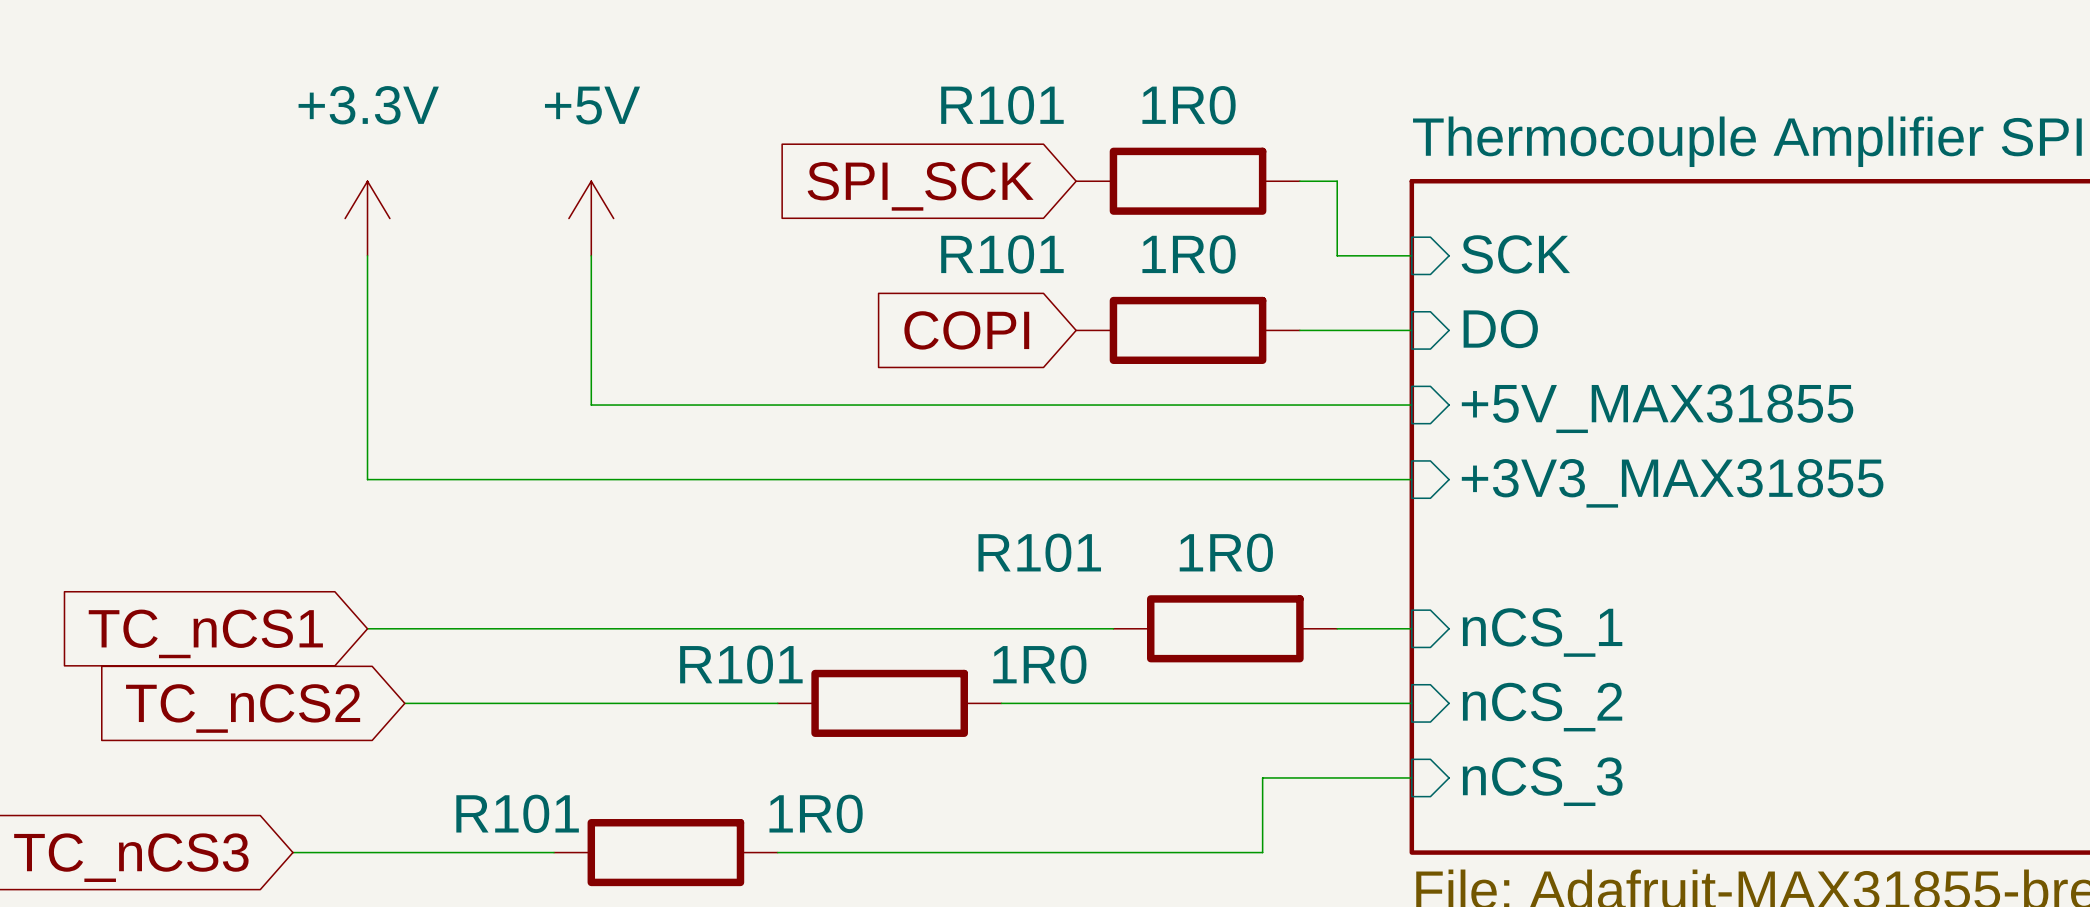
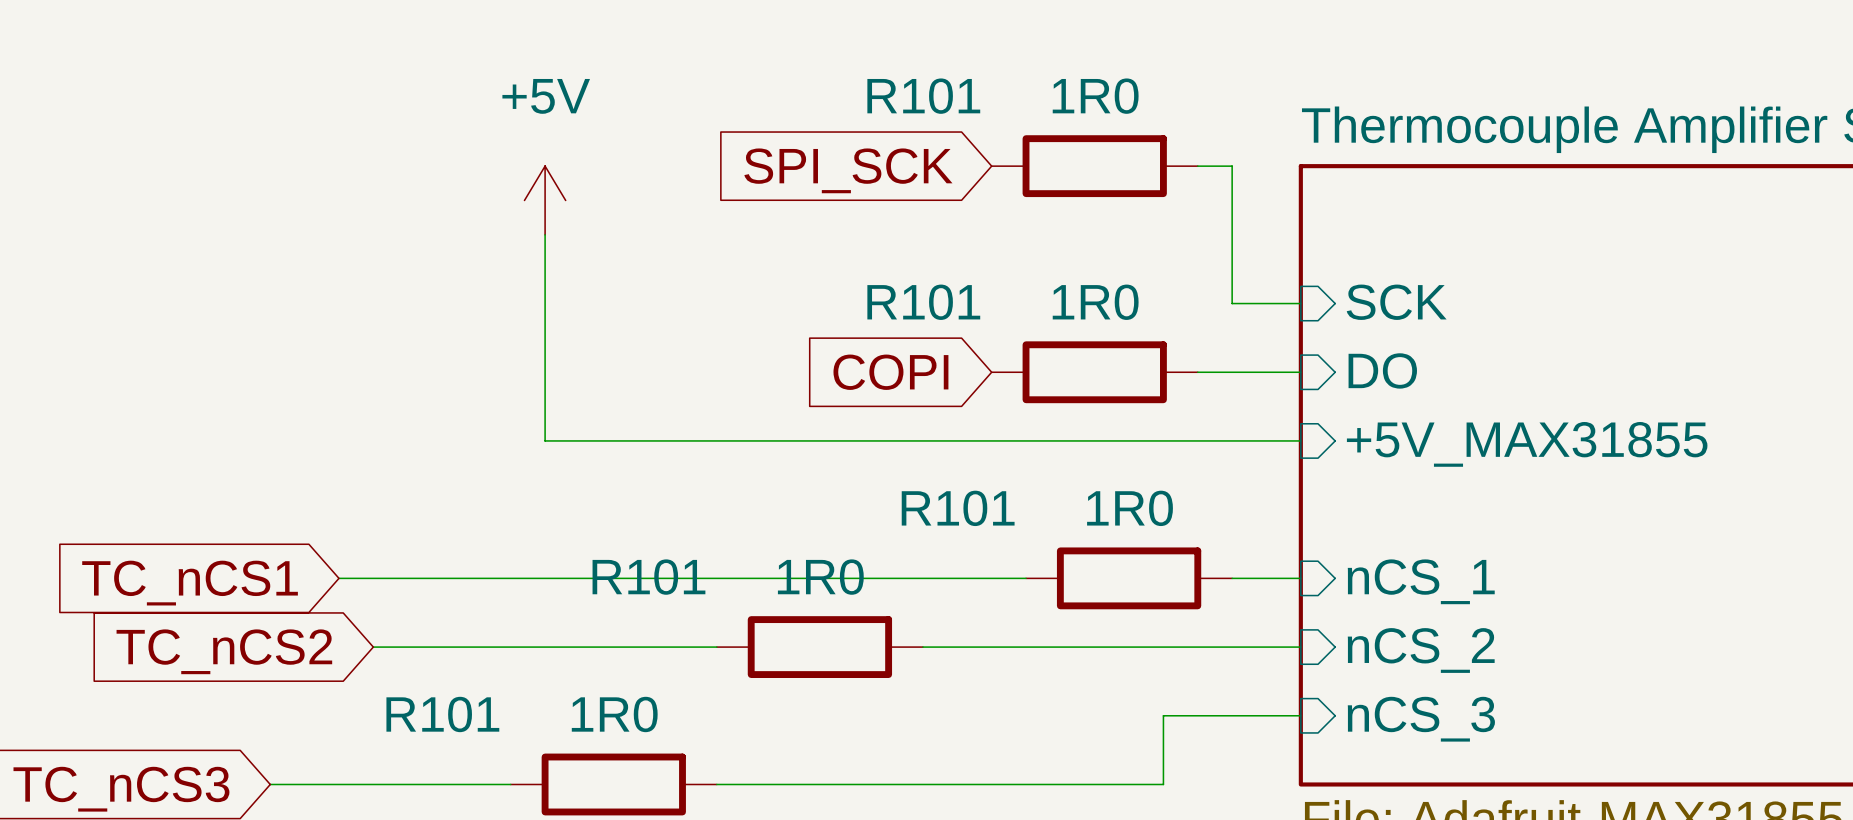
power symbol: +3.3V (367, 218) -> none
sheet pin: SCK (1515, 254) -> none
wire: (367, 255) (367, 479) (591, 479) -> (545, 372) (545, 440)
wire: (1337, 255) (1411, 255) -> none
sheet pin: DO (1500, 329) -> SCK (1396, 302)
global label position: COPI (966, 330) -> COPI (890, 372)
R101 position: (1188, 330) -> (1094, 372)
wire: (1299, 330) (1337, 330) -> (1232, 234) (1232, 303)
wire: (591, 405) (1299, 405) -> none
sheet pin: +5V_MAX31855 (1657, 408) -> DO (1382, 370)
sheet pin: +3V3_MAX31855 (1672, 483) -> +5V_MAX31855 (1527, 444)
R101 name position: R101 (741, 664) -> R101 (648, 577)
R101 value position: 1R0 (1039, 664) -> 1R0 (820, 577)
R101 name position: R101 (517, 813) -> R101 (442, 714)
R101 value position: 1R0 (816, 813) -> 1R0 (614, 714)

